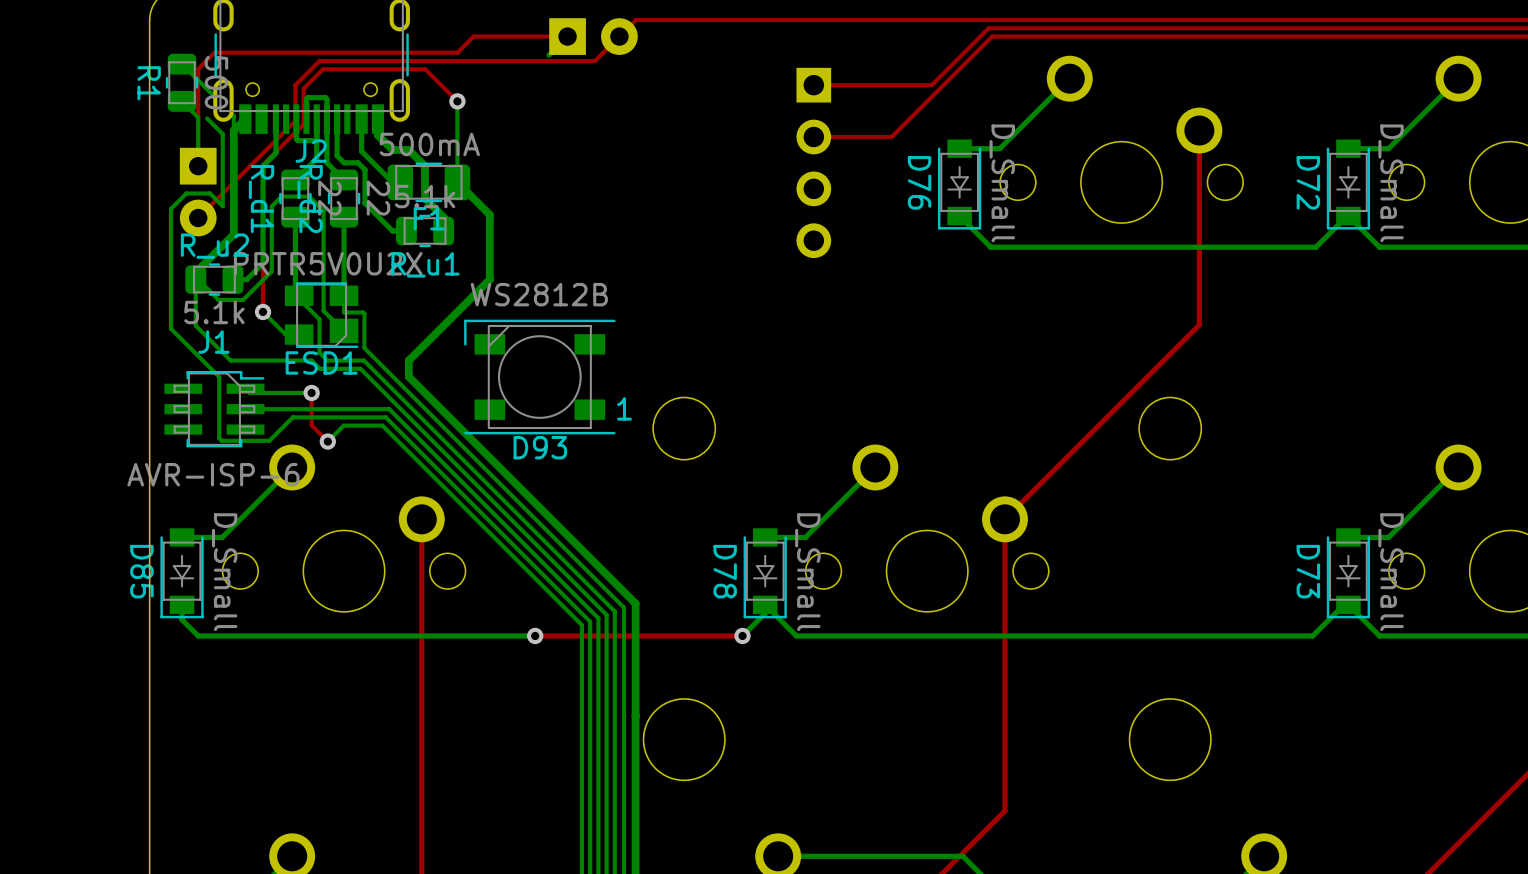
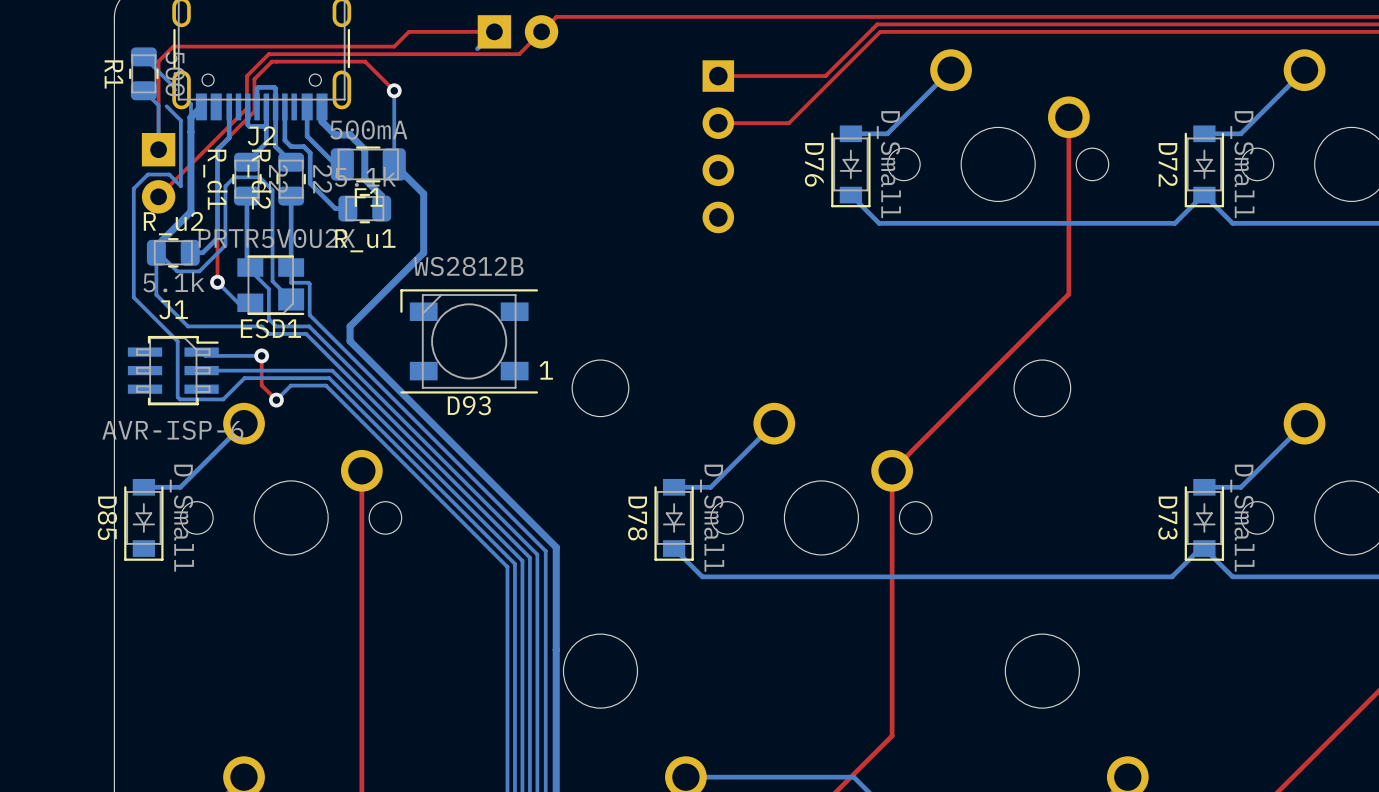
bottom track: (182, 604) (182, 619) (198, 635) (535, 635) -> none
bottom track: (765, 604) (765, 613) (742, 635) -> none
via: (535, 635) -> none
top track: (742, 635) (535, 635) -> none
via: (742, 635) -> none

